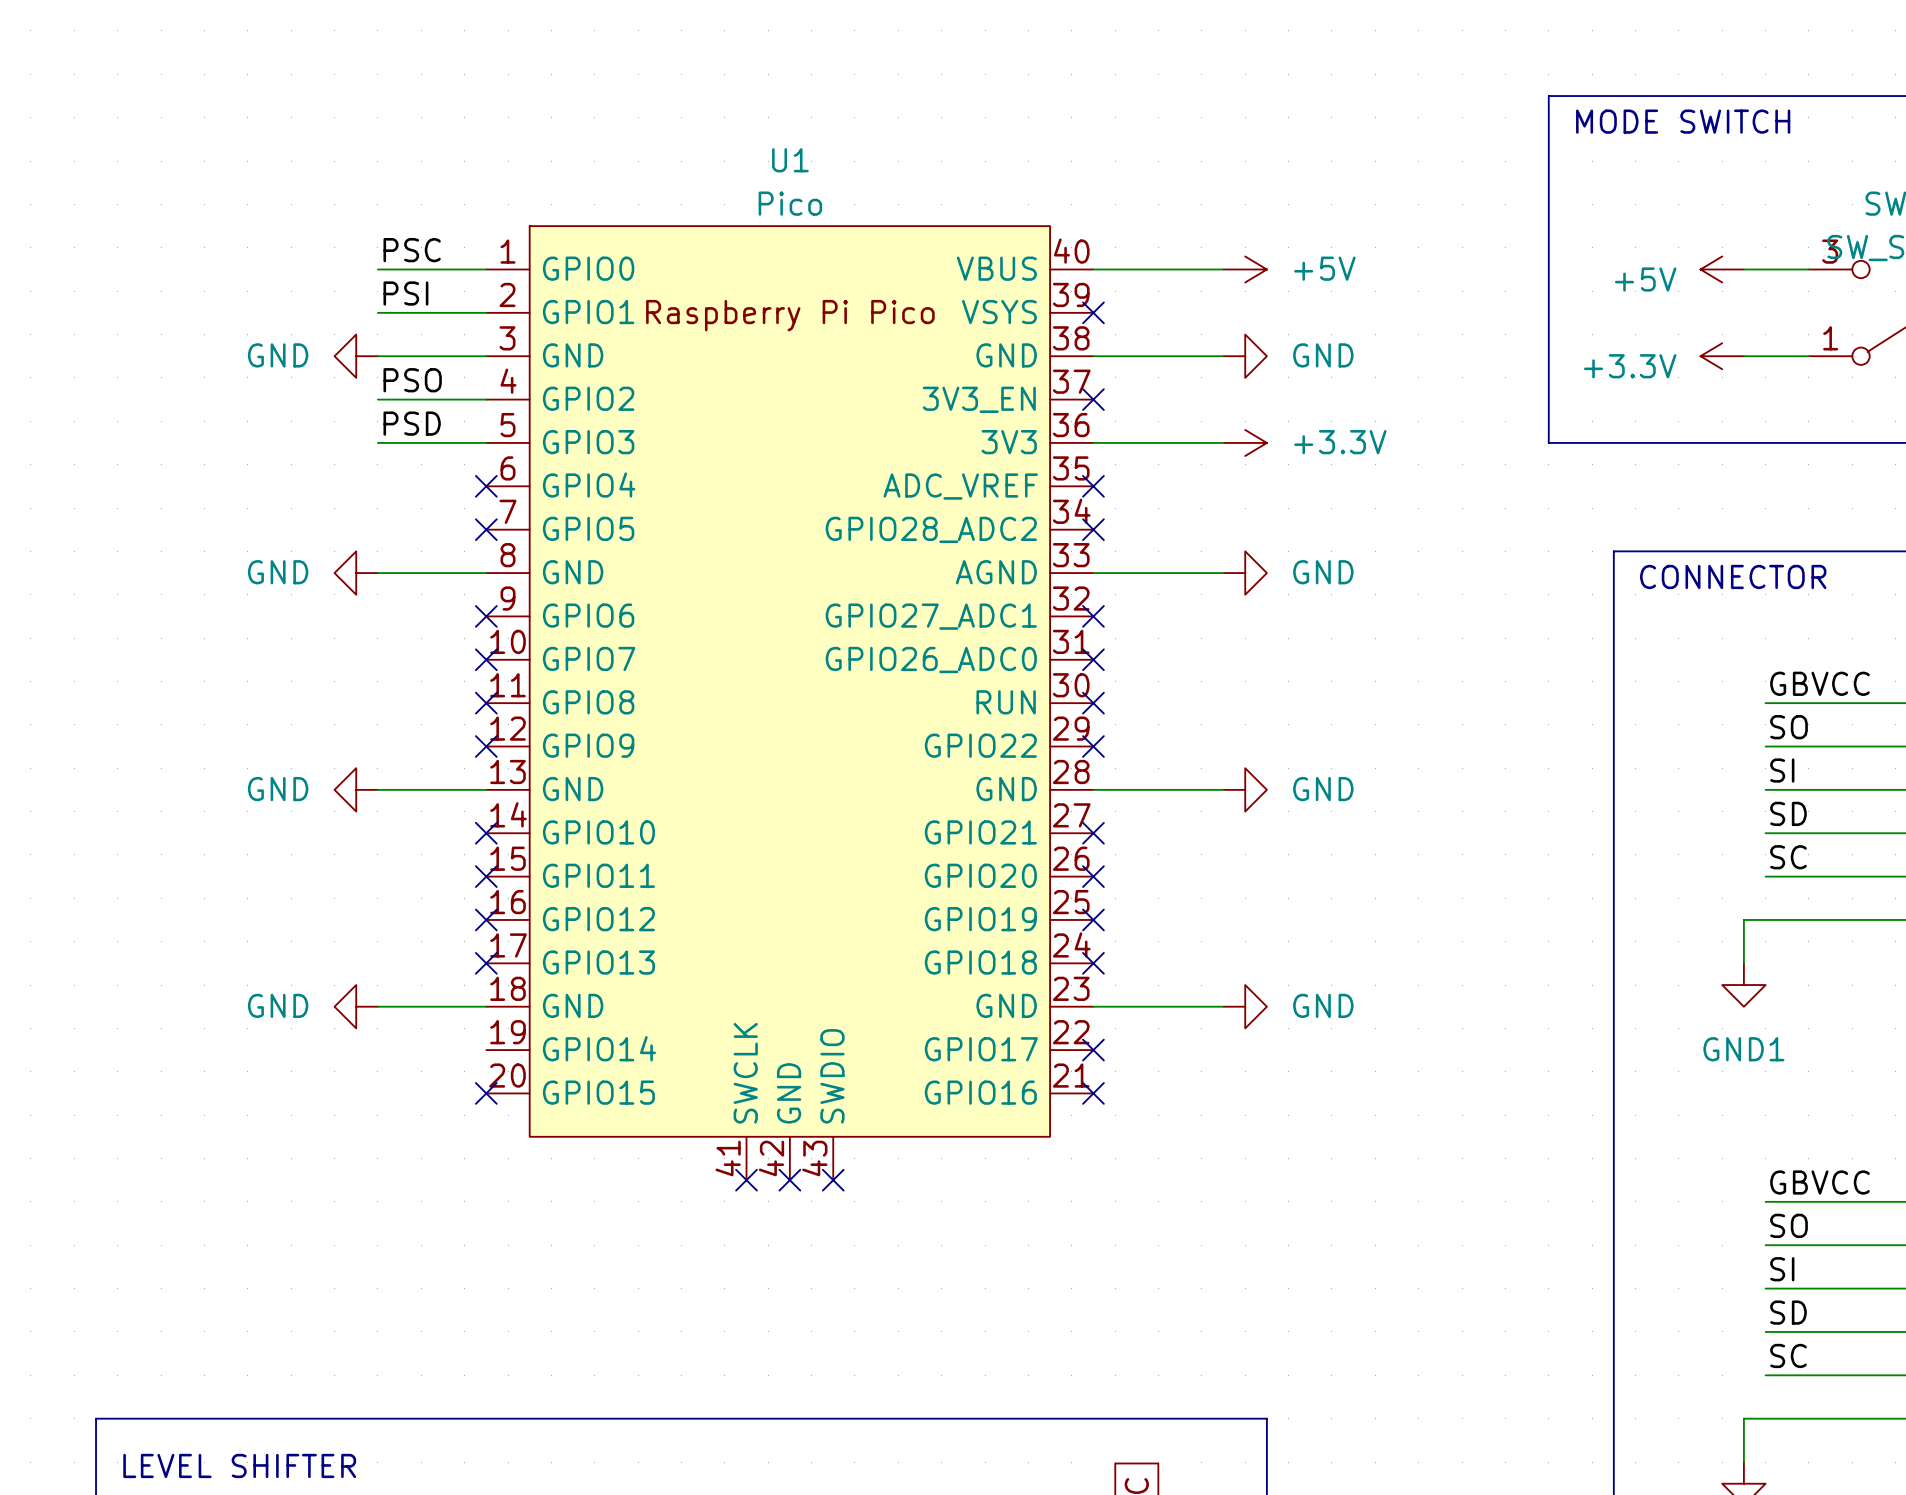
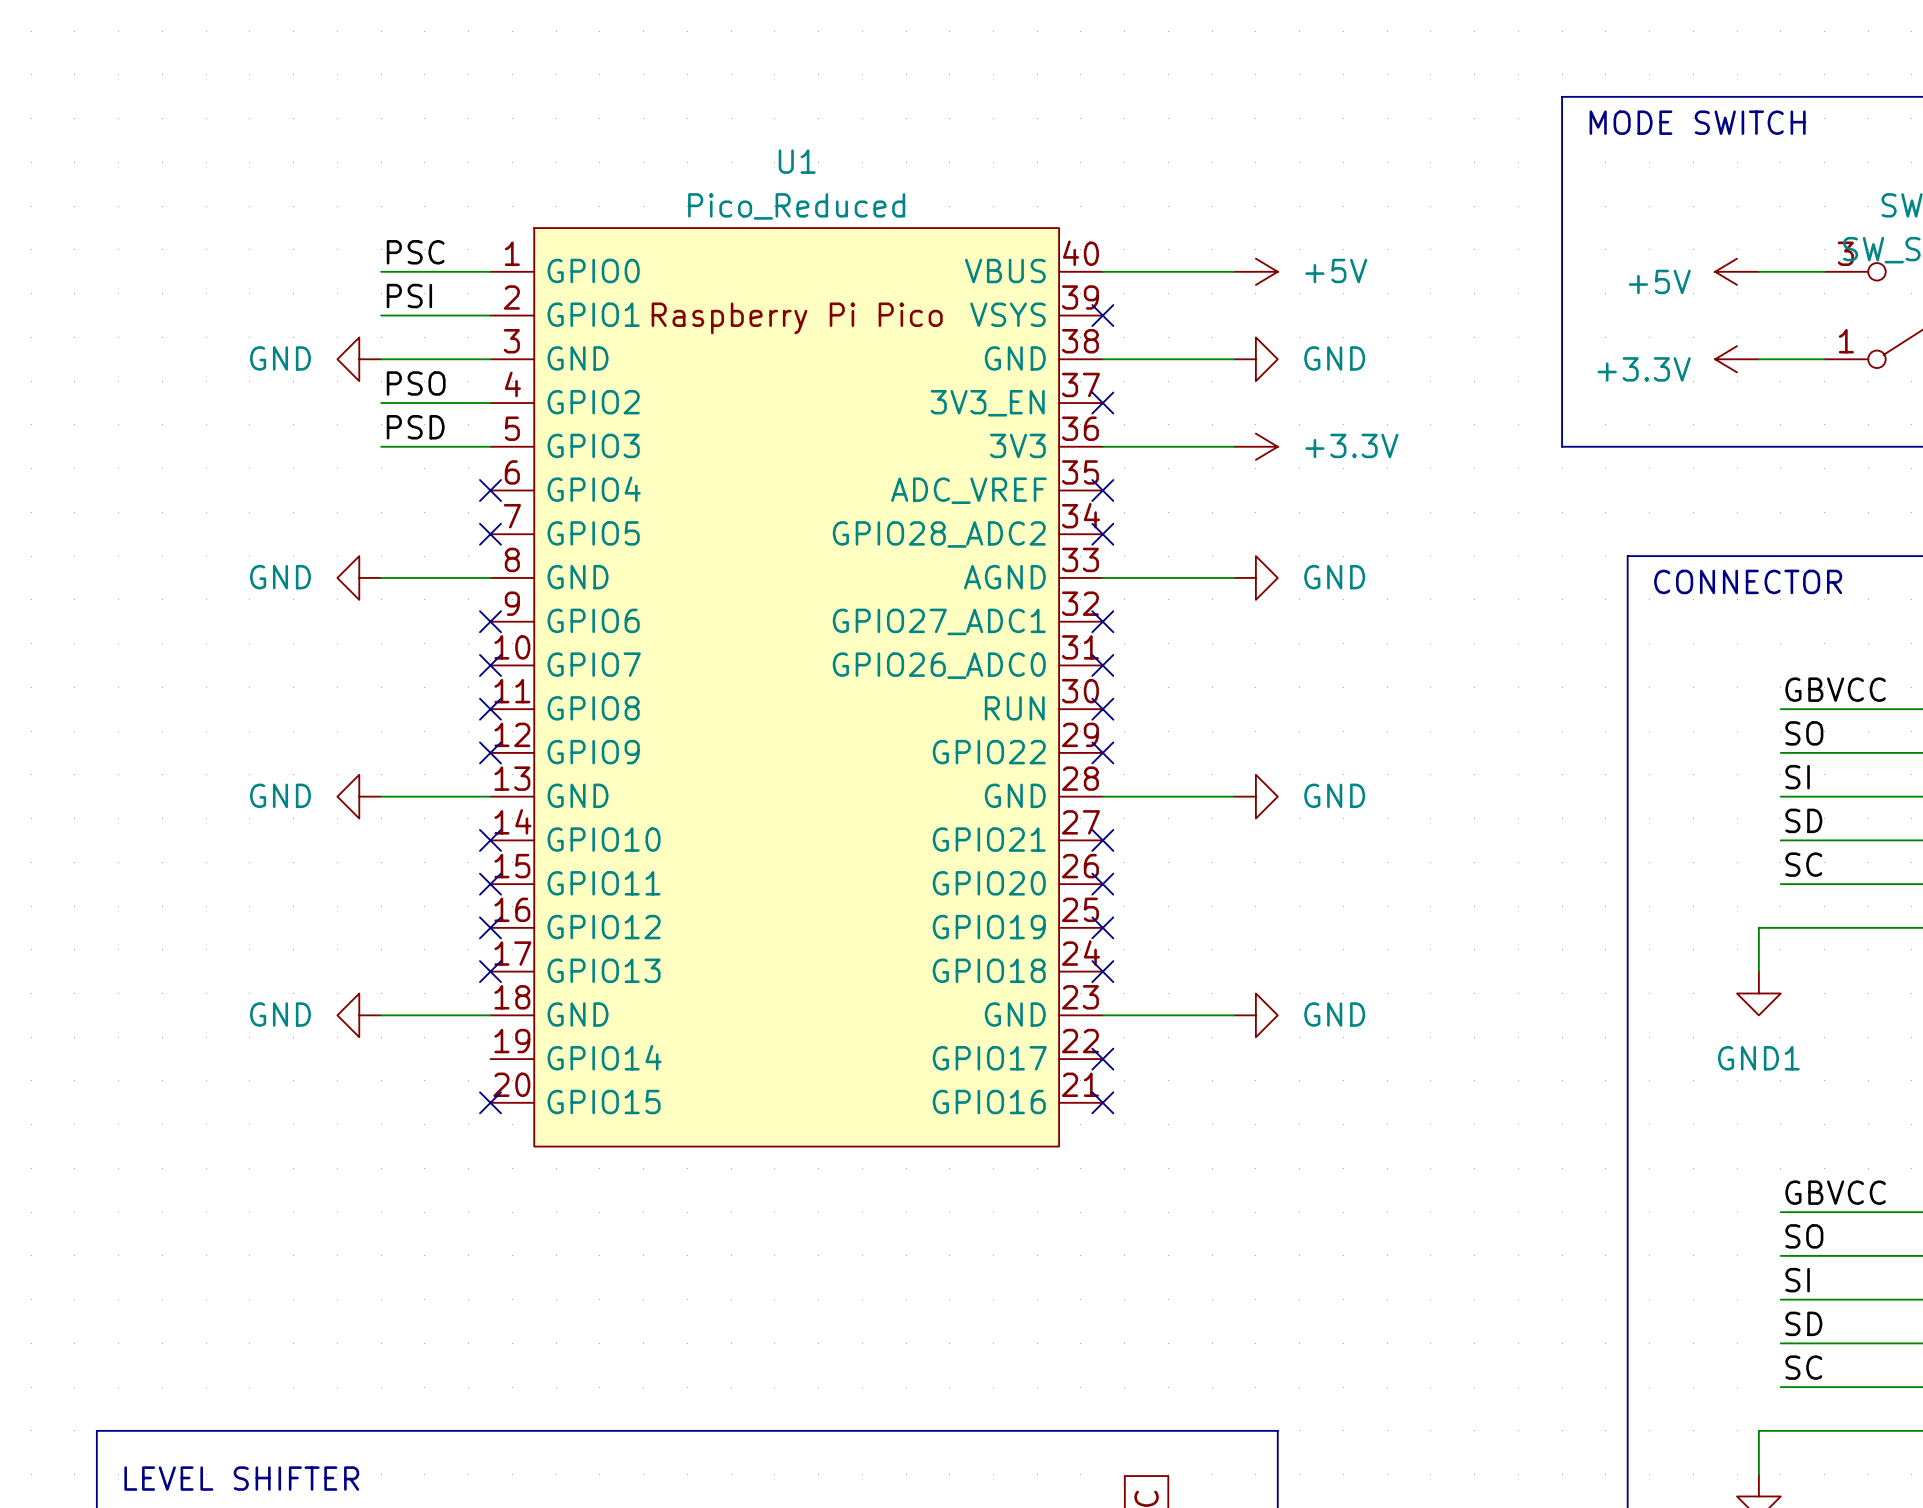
U1 value: Pico (790, 203) -> Pico_Reduced (796, 206)
U1 symbol: [486, 226, 1094, 1181] -> [490, 228, 1103, 1147]
no-connect mark: (746, 1180) -> none
no-connect mark: (789, 1180) -> none
no-connect mark: (833, 1180) -> none

